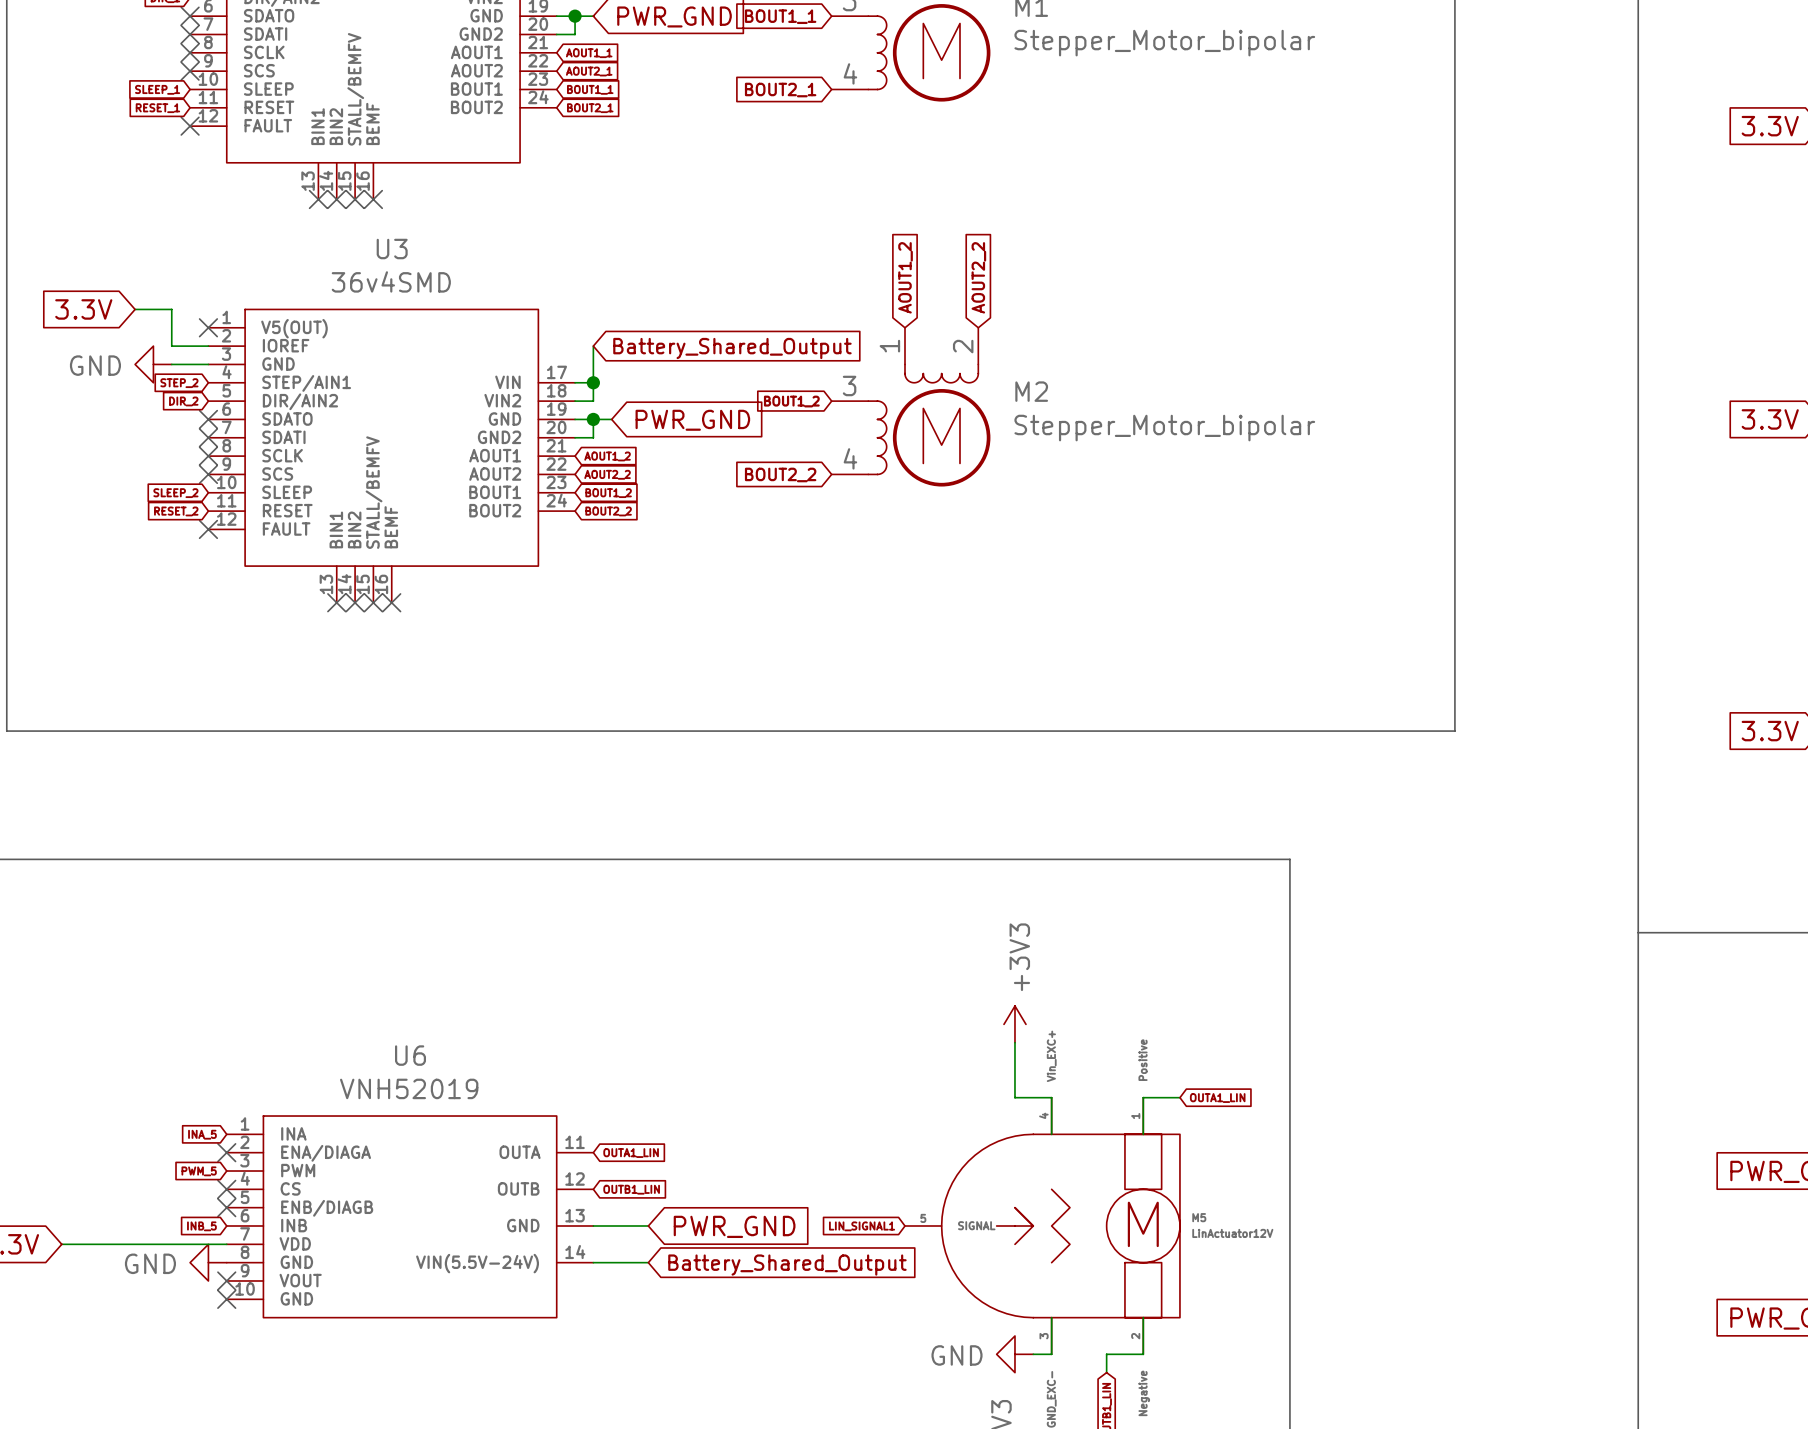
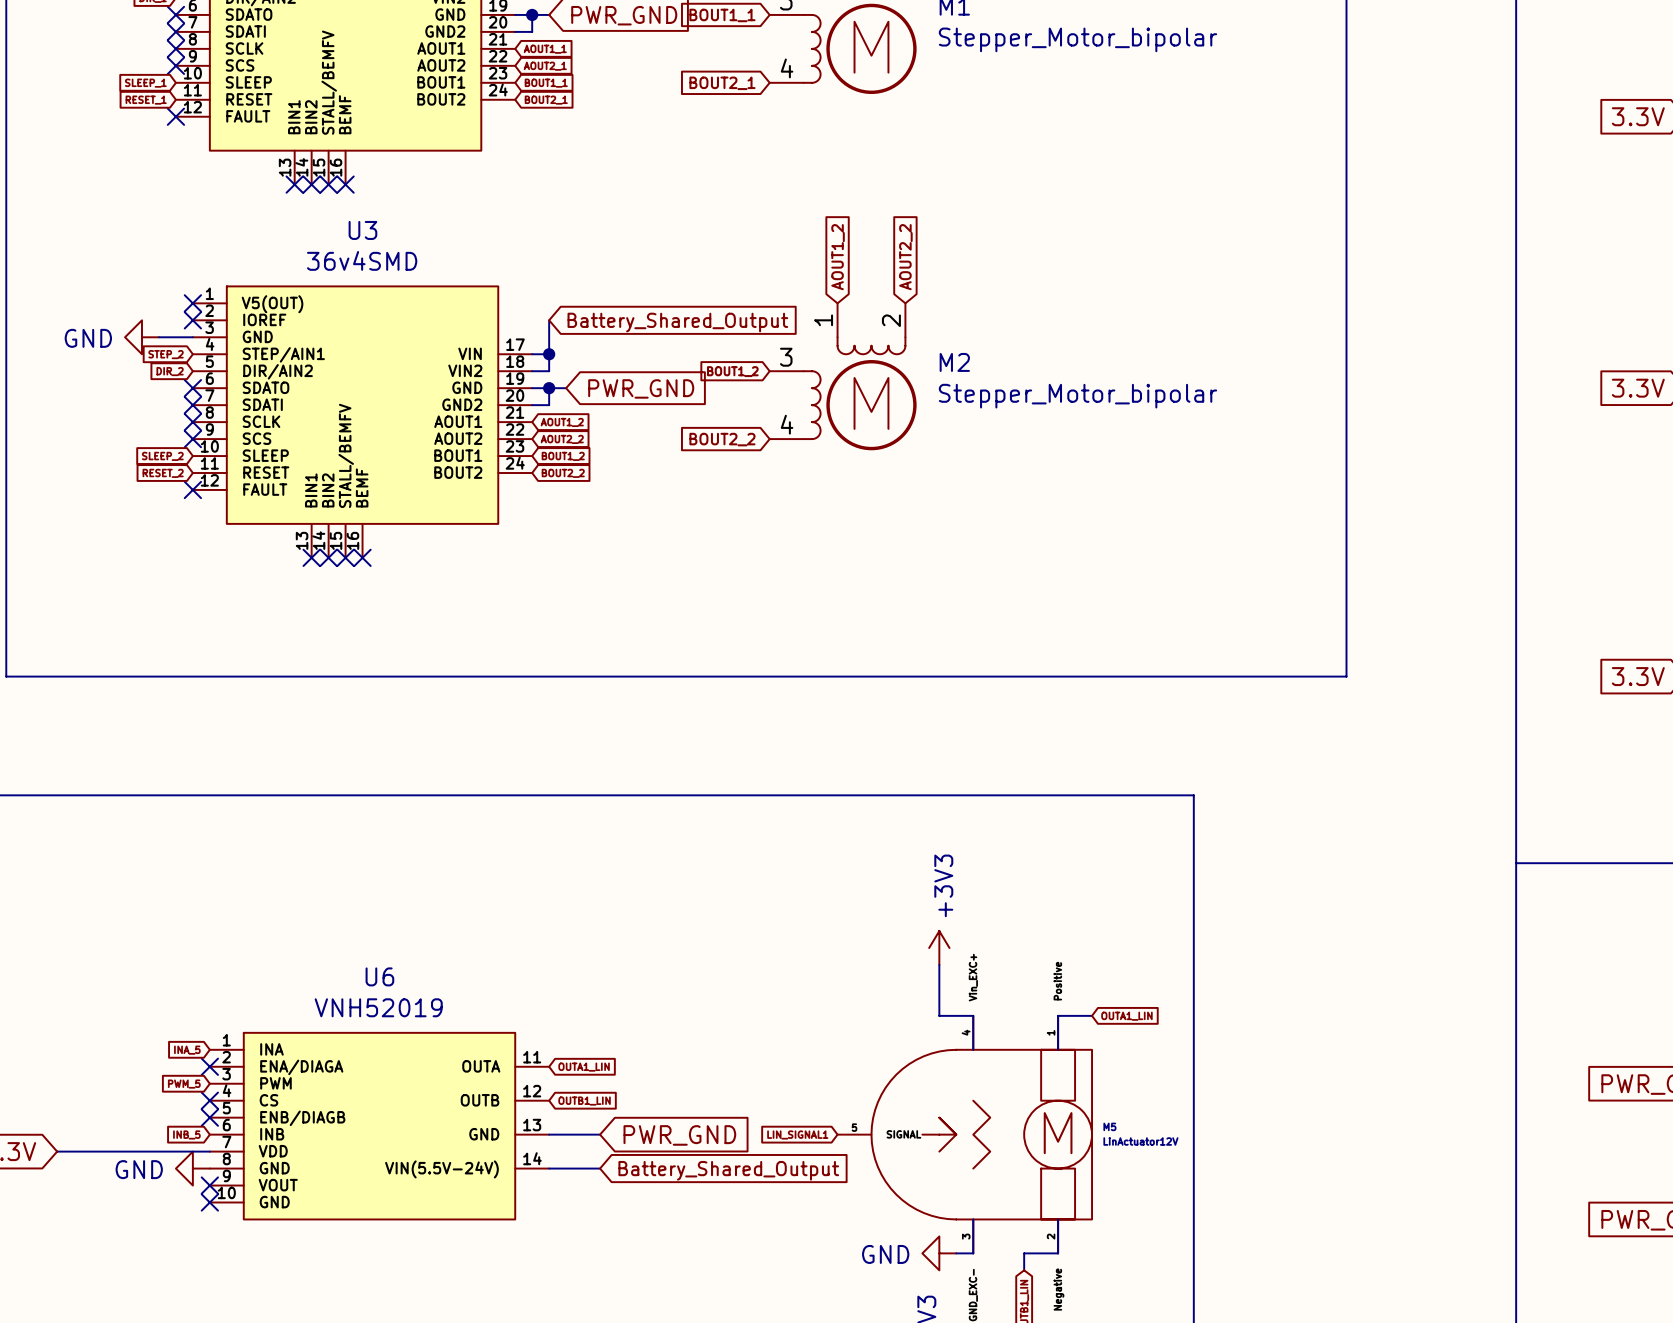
global label: 3.3V (83, 309) -> none
wire: (135, 309) (171, 309) (171, 346) (208, 346) -> none
no-connect mark: none -> (192, 320)

